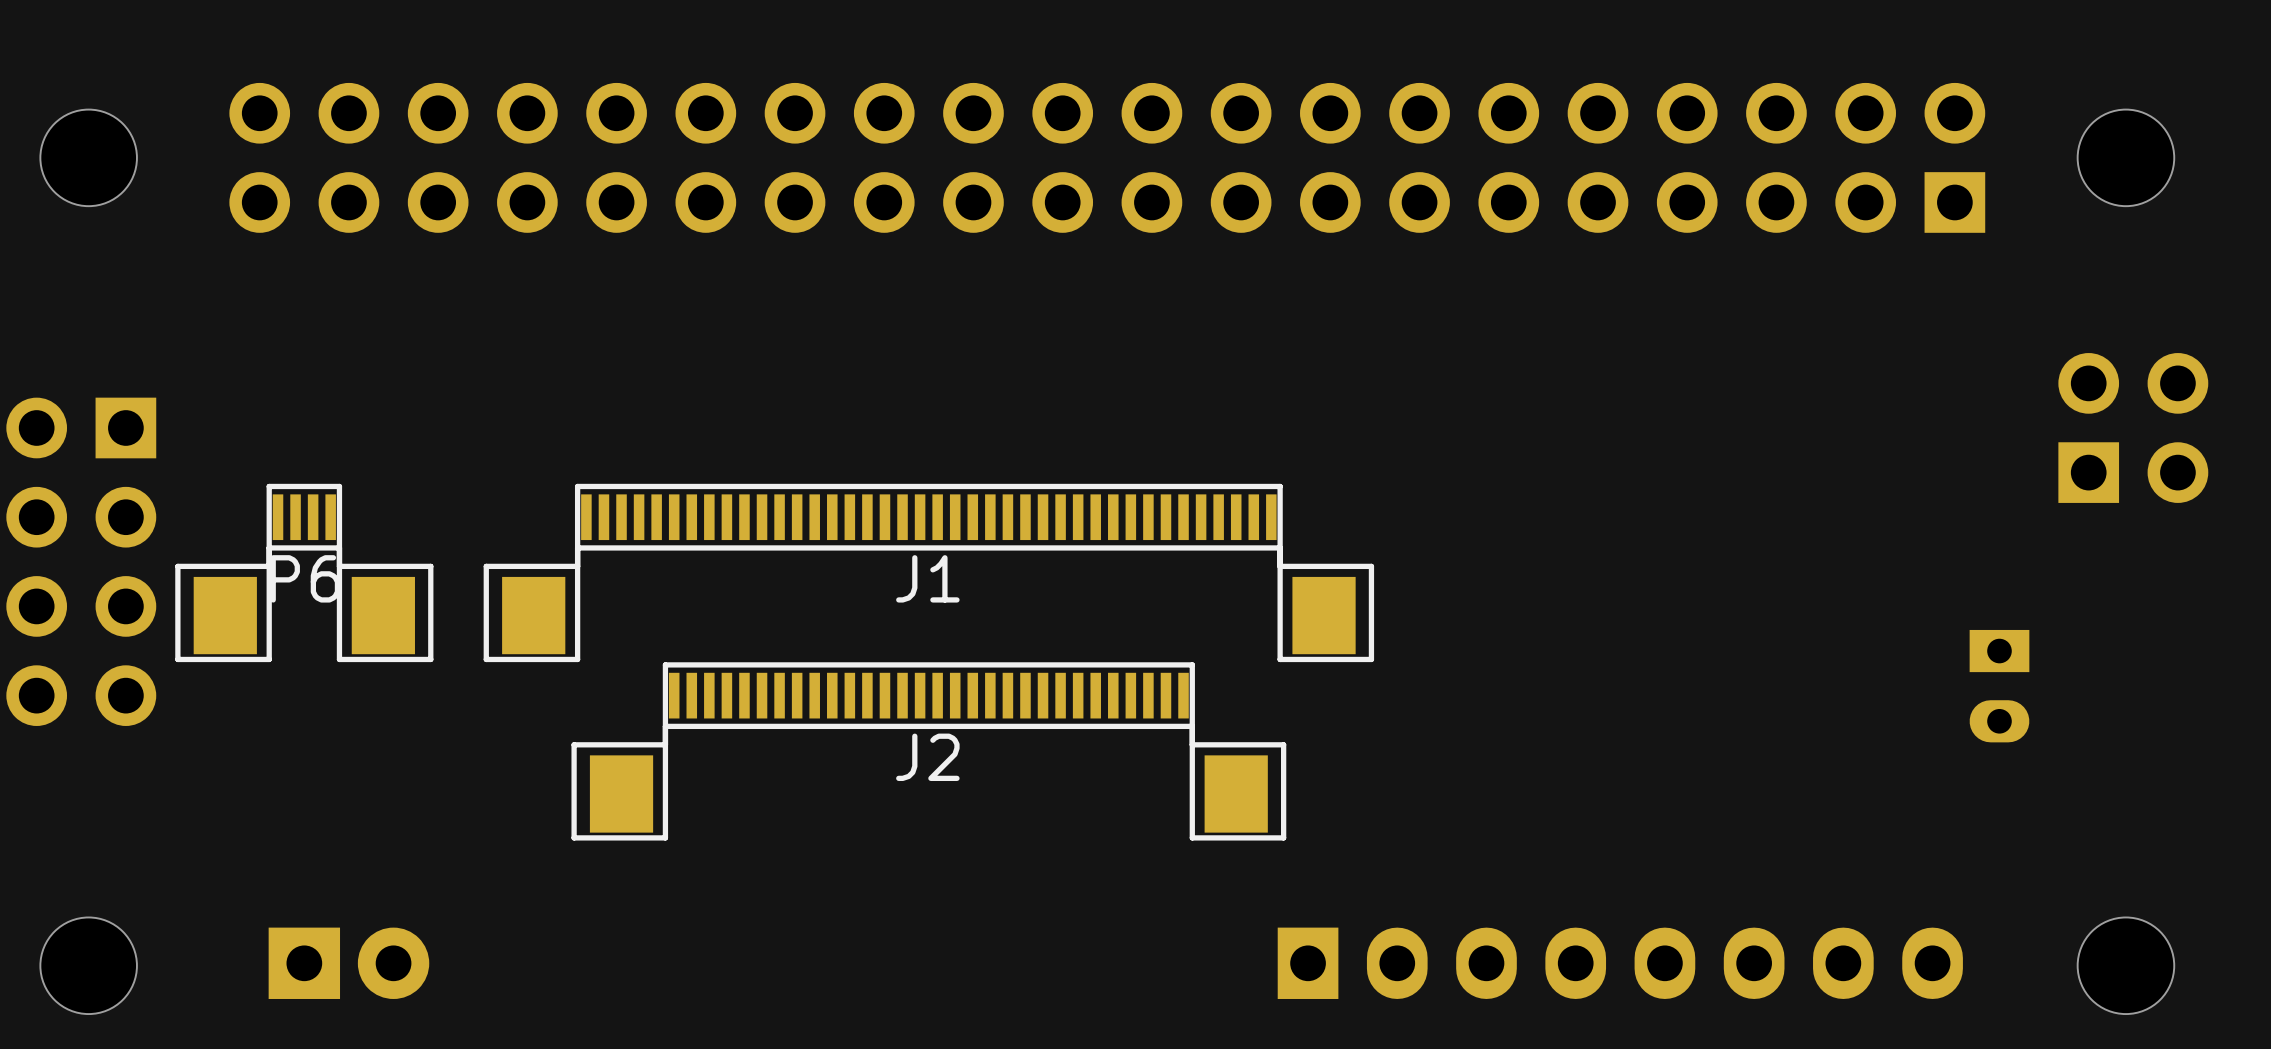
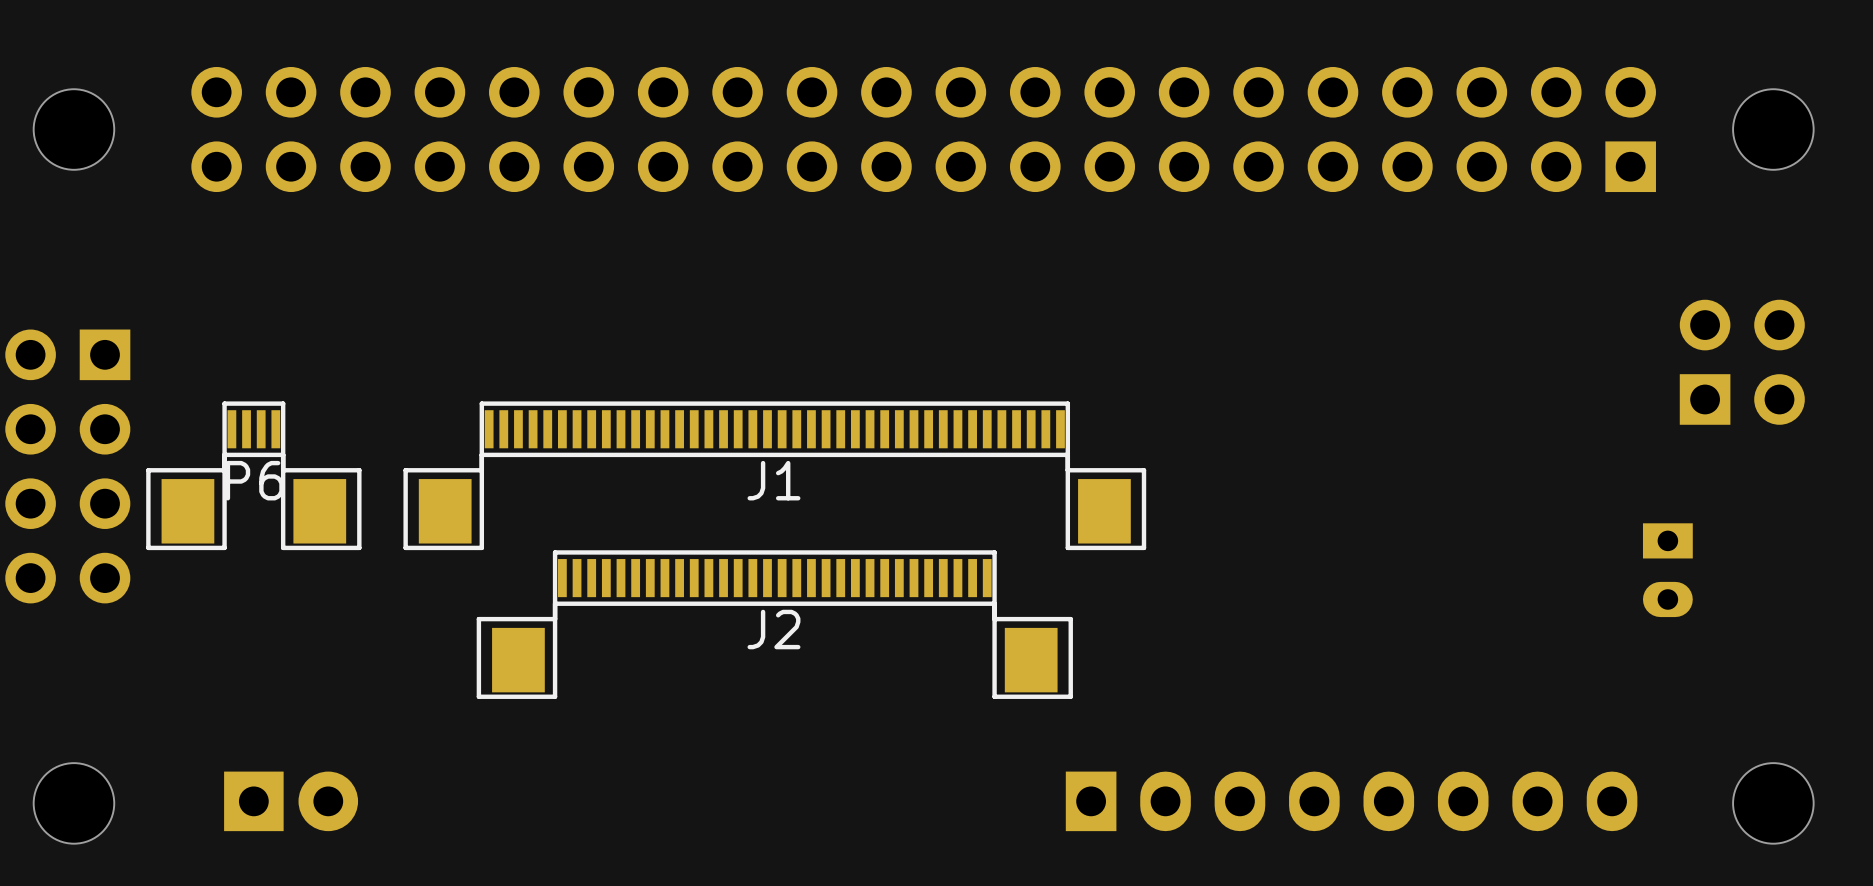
part position: (2133, 427) -> (1742, 362)

